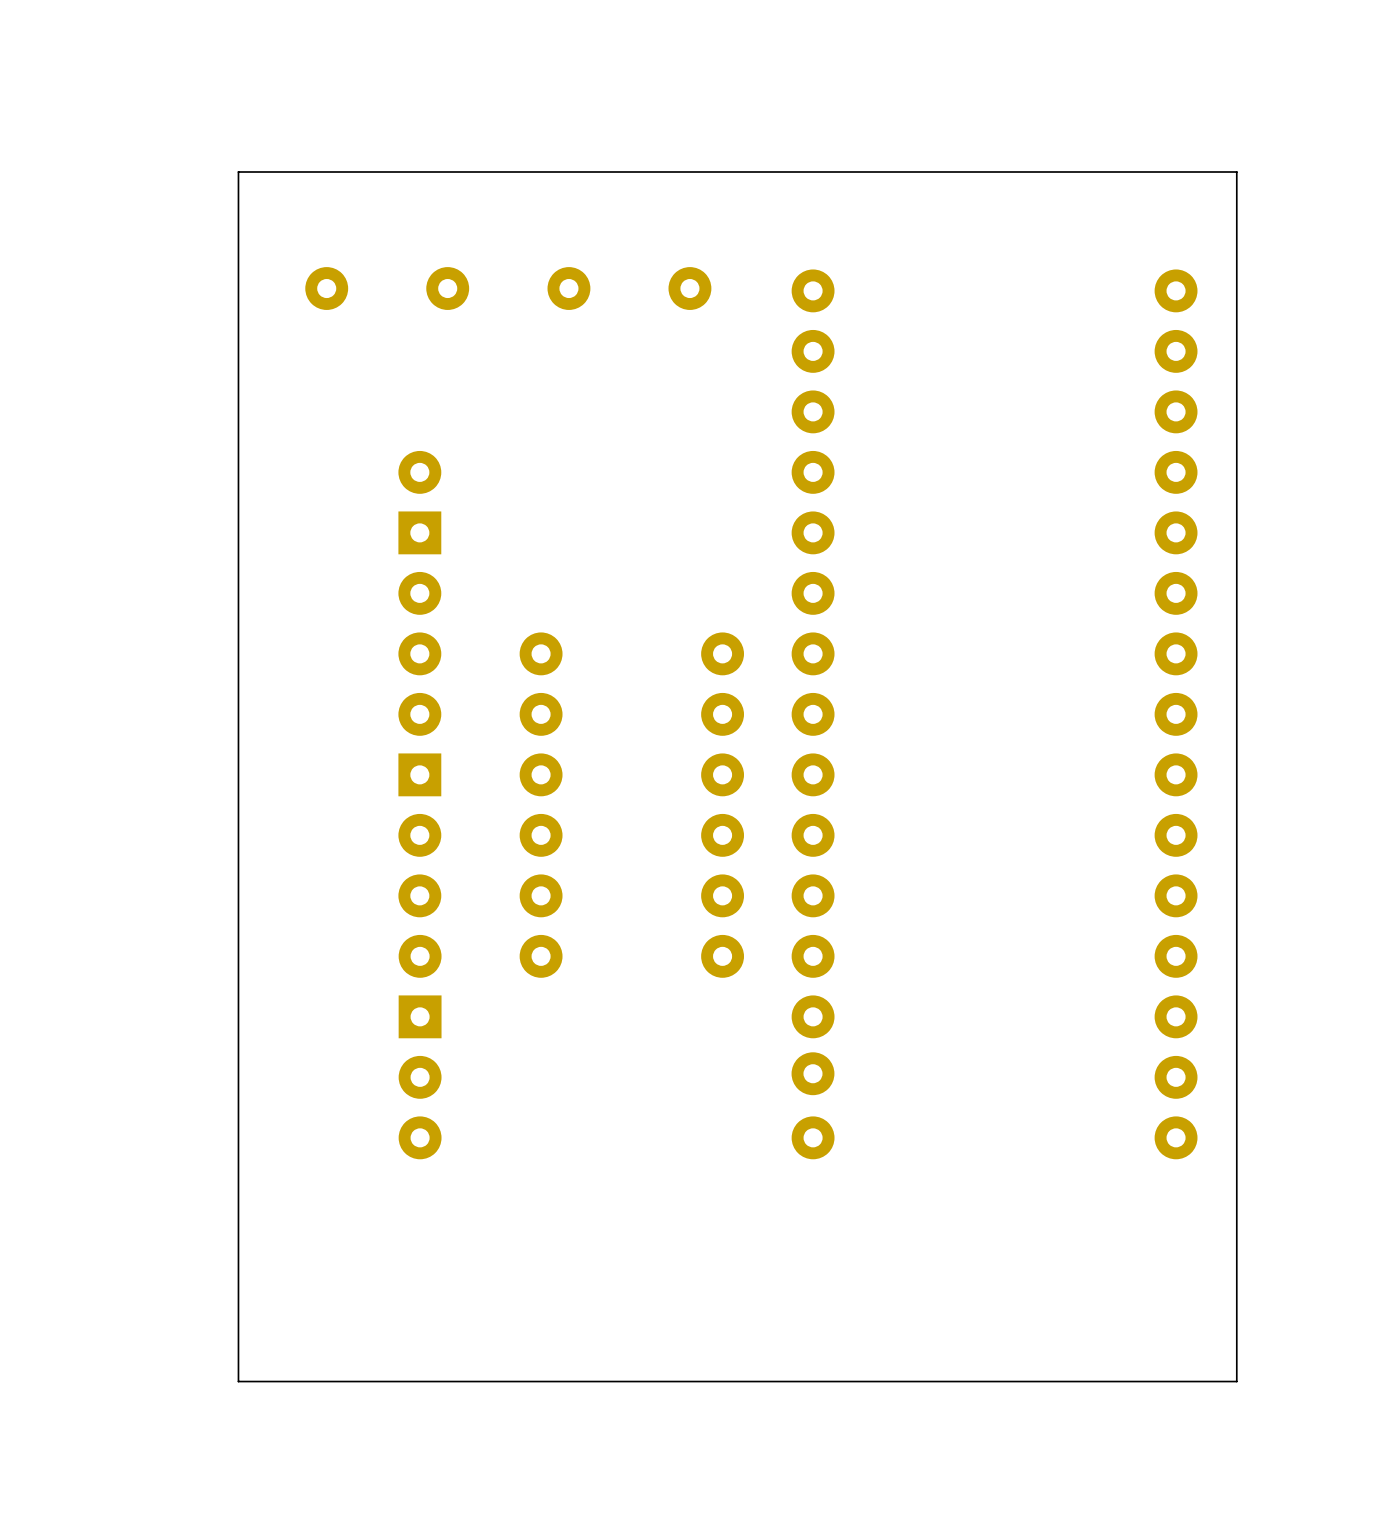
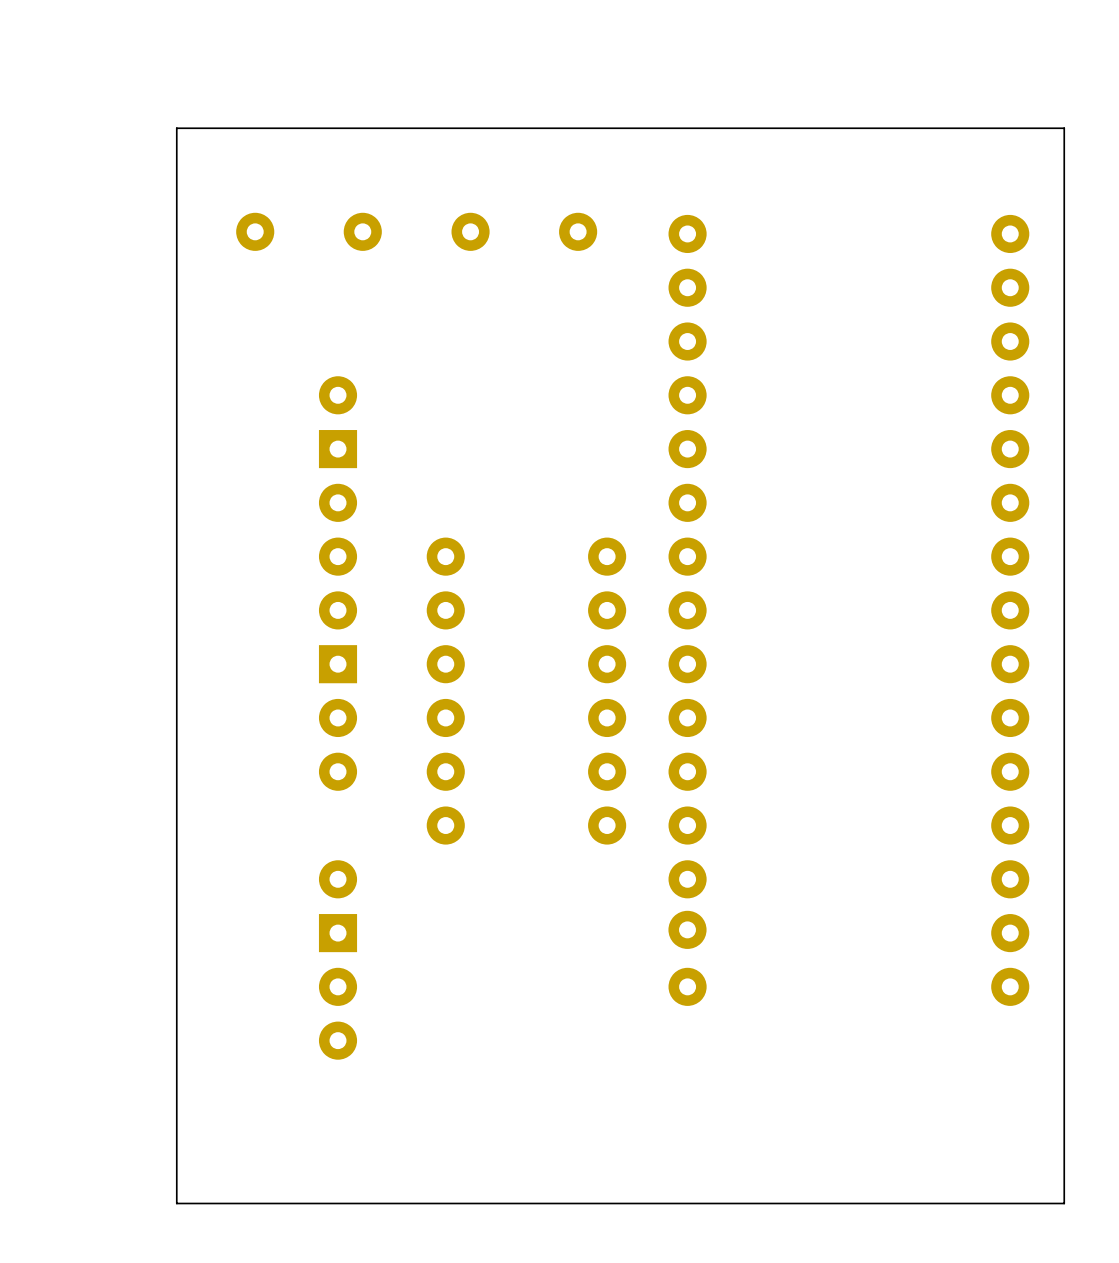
part position: (420, 1047) -> (338, 959)

